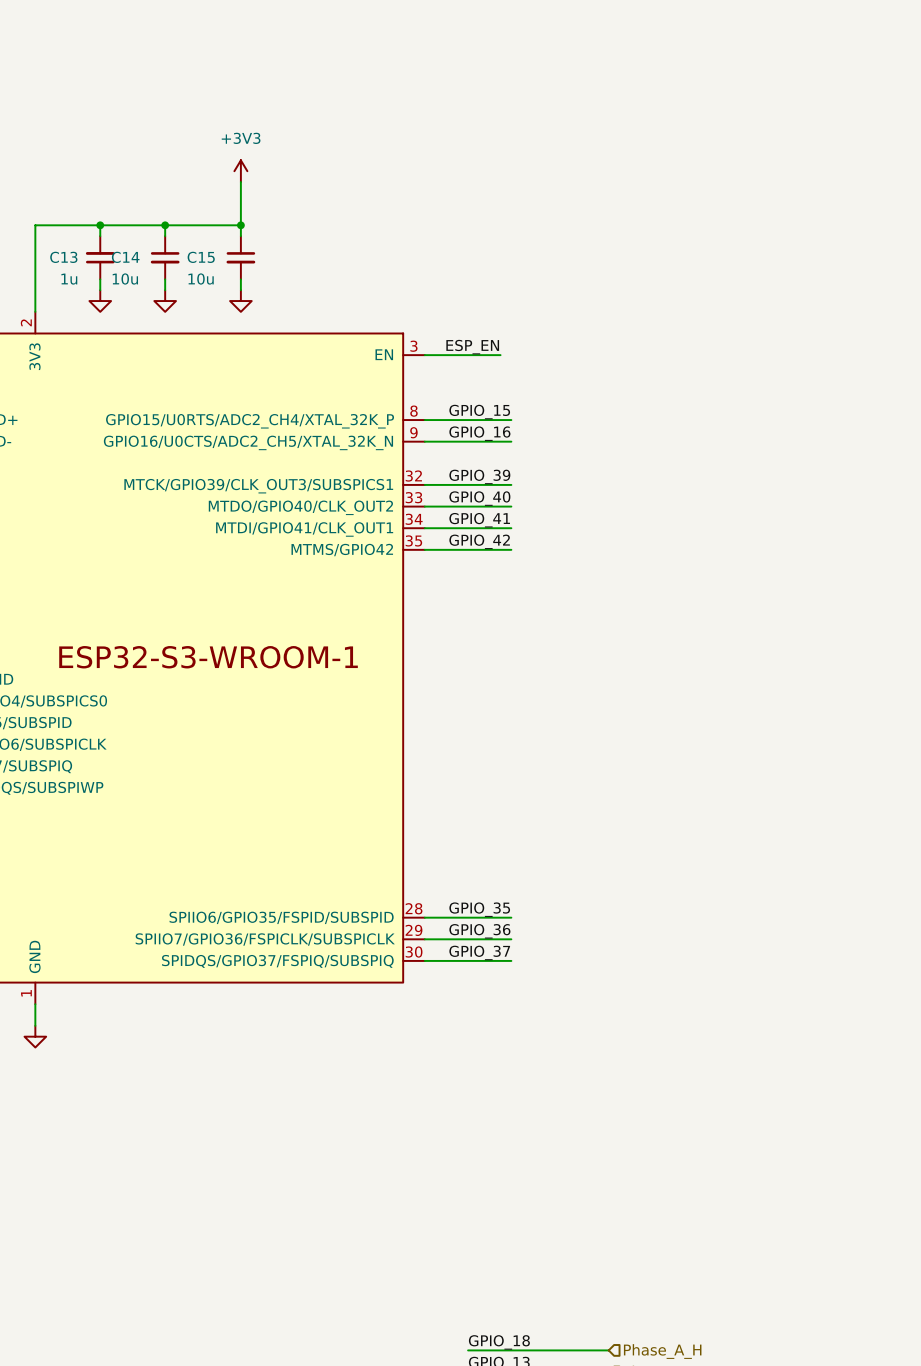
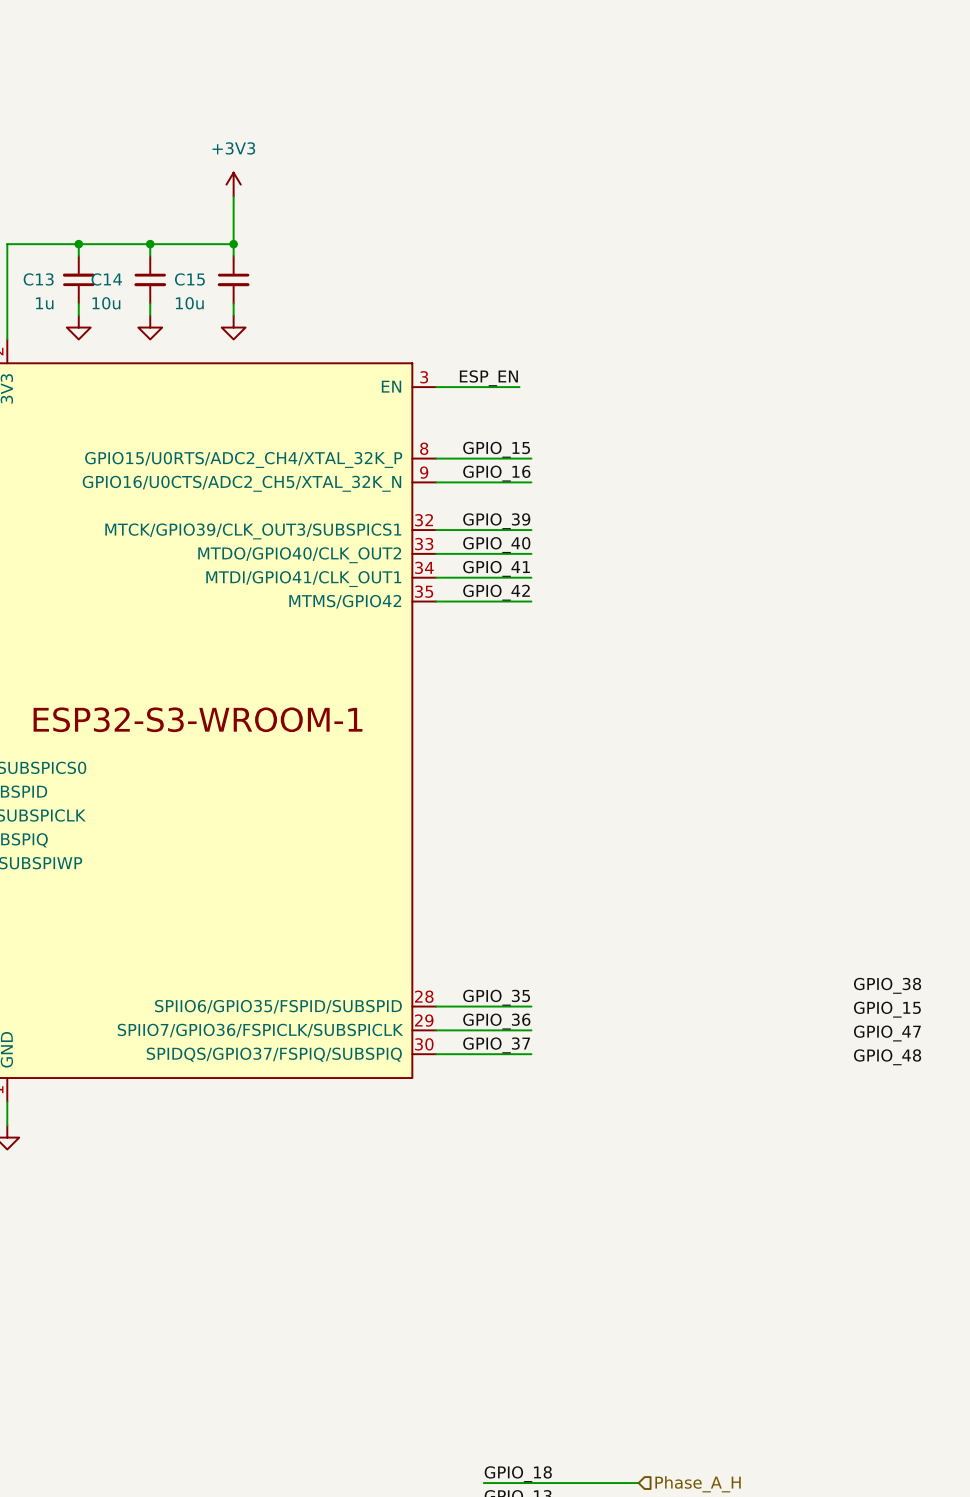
label: none -> GPIO_38 (887, 985)
label: none -> GPIO_15 (887, 1009)
label: none -> GPIO_47 (887, 1033)
label: none -> GPIO_48 (887, 1057)

